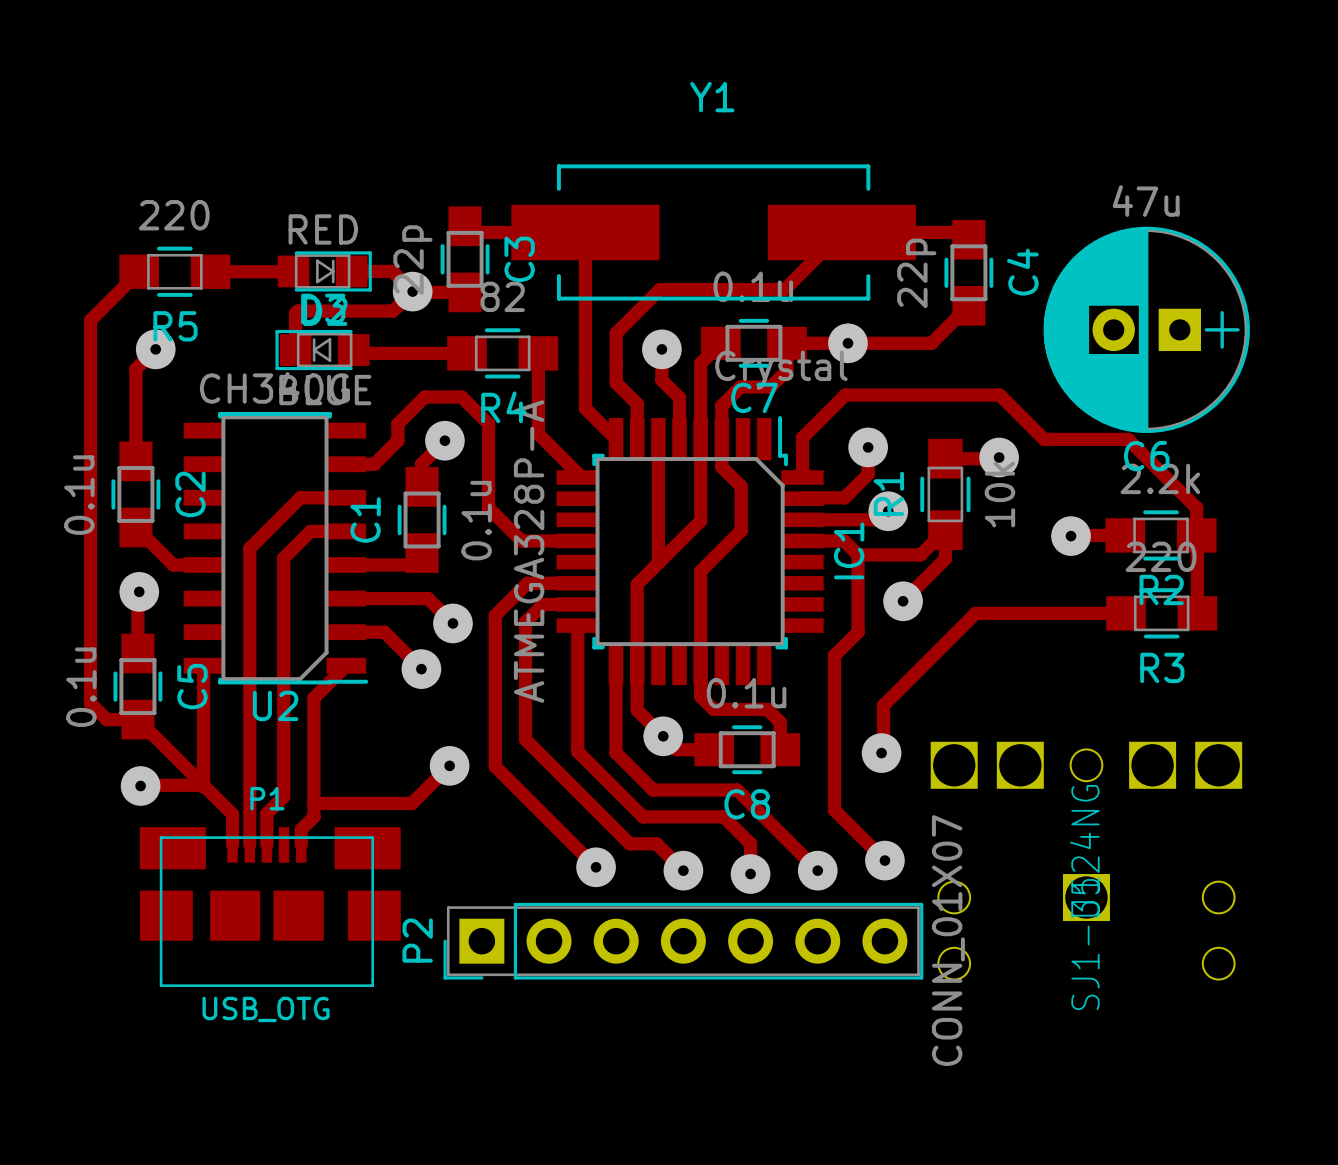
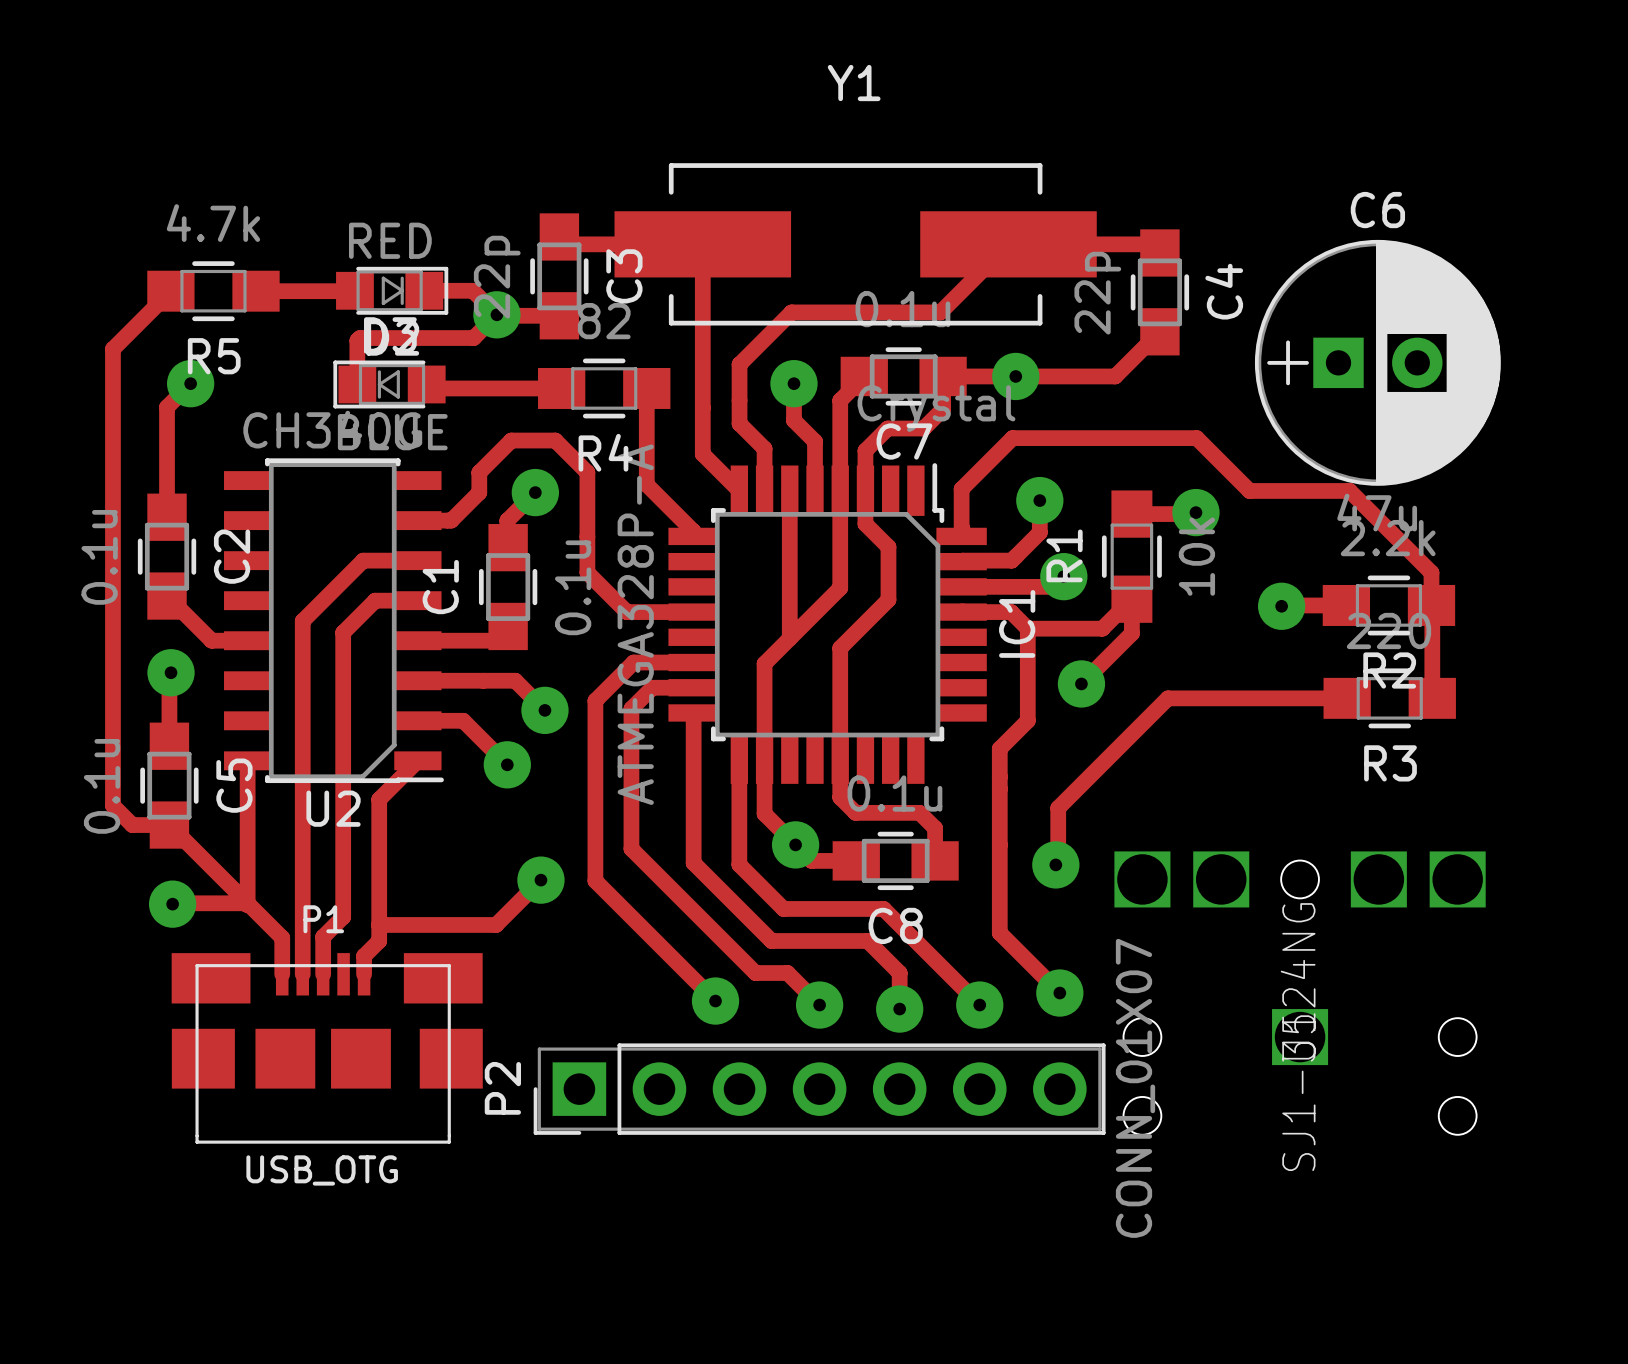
R5 value: 220 (174, 215) -> 4.7k (213, 223)
C6 rotation: 0° (1146, 329) -> 180° (1377, 362)

